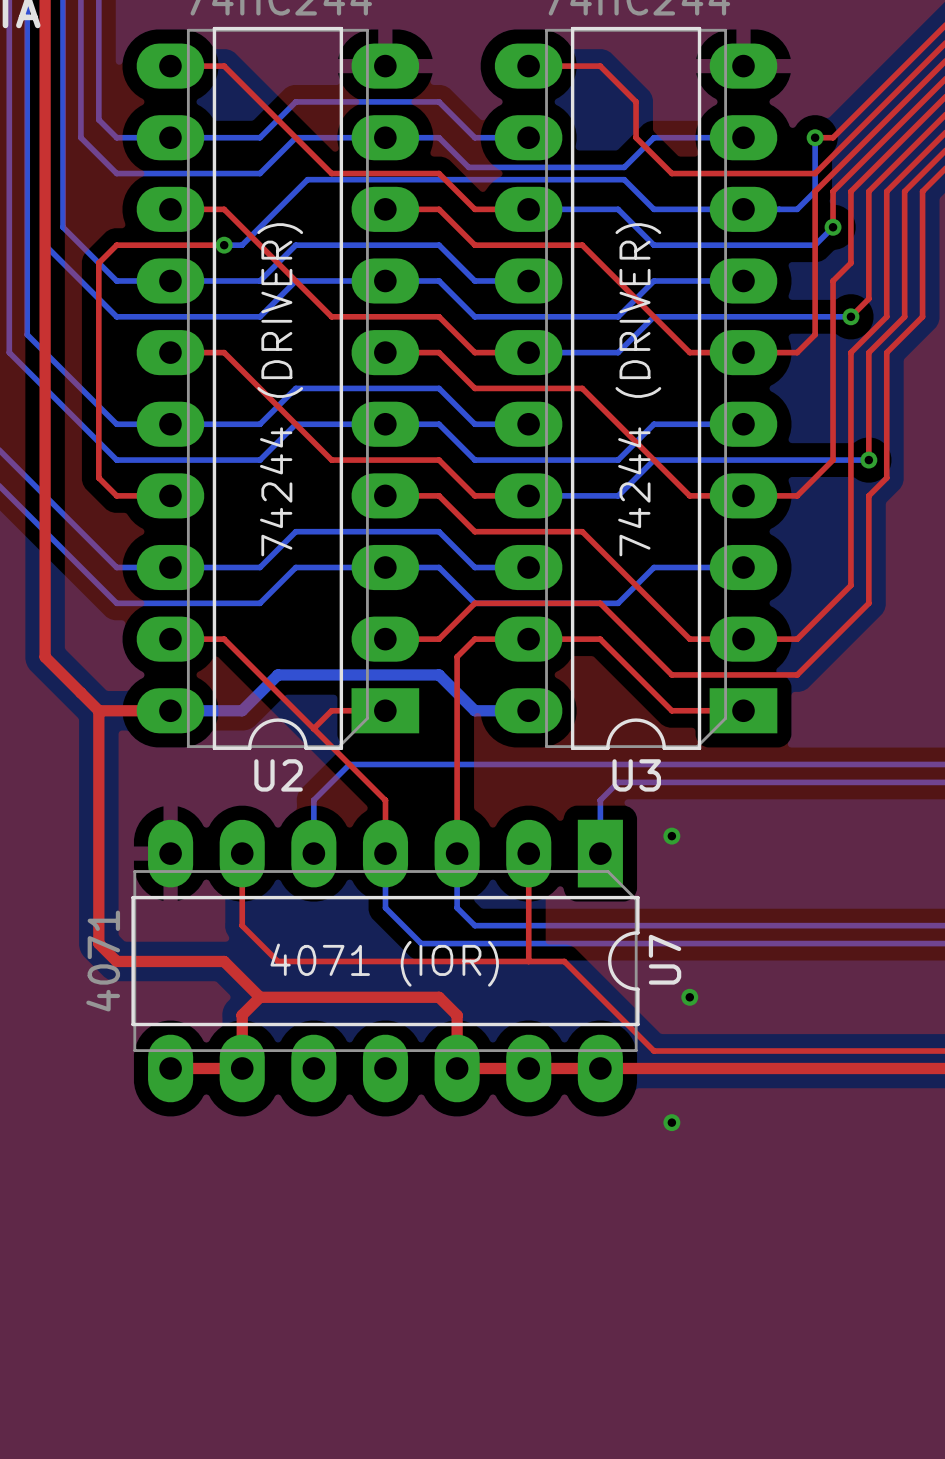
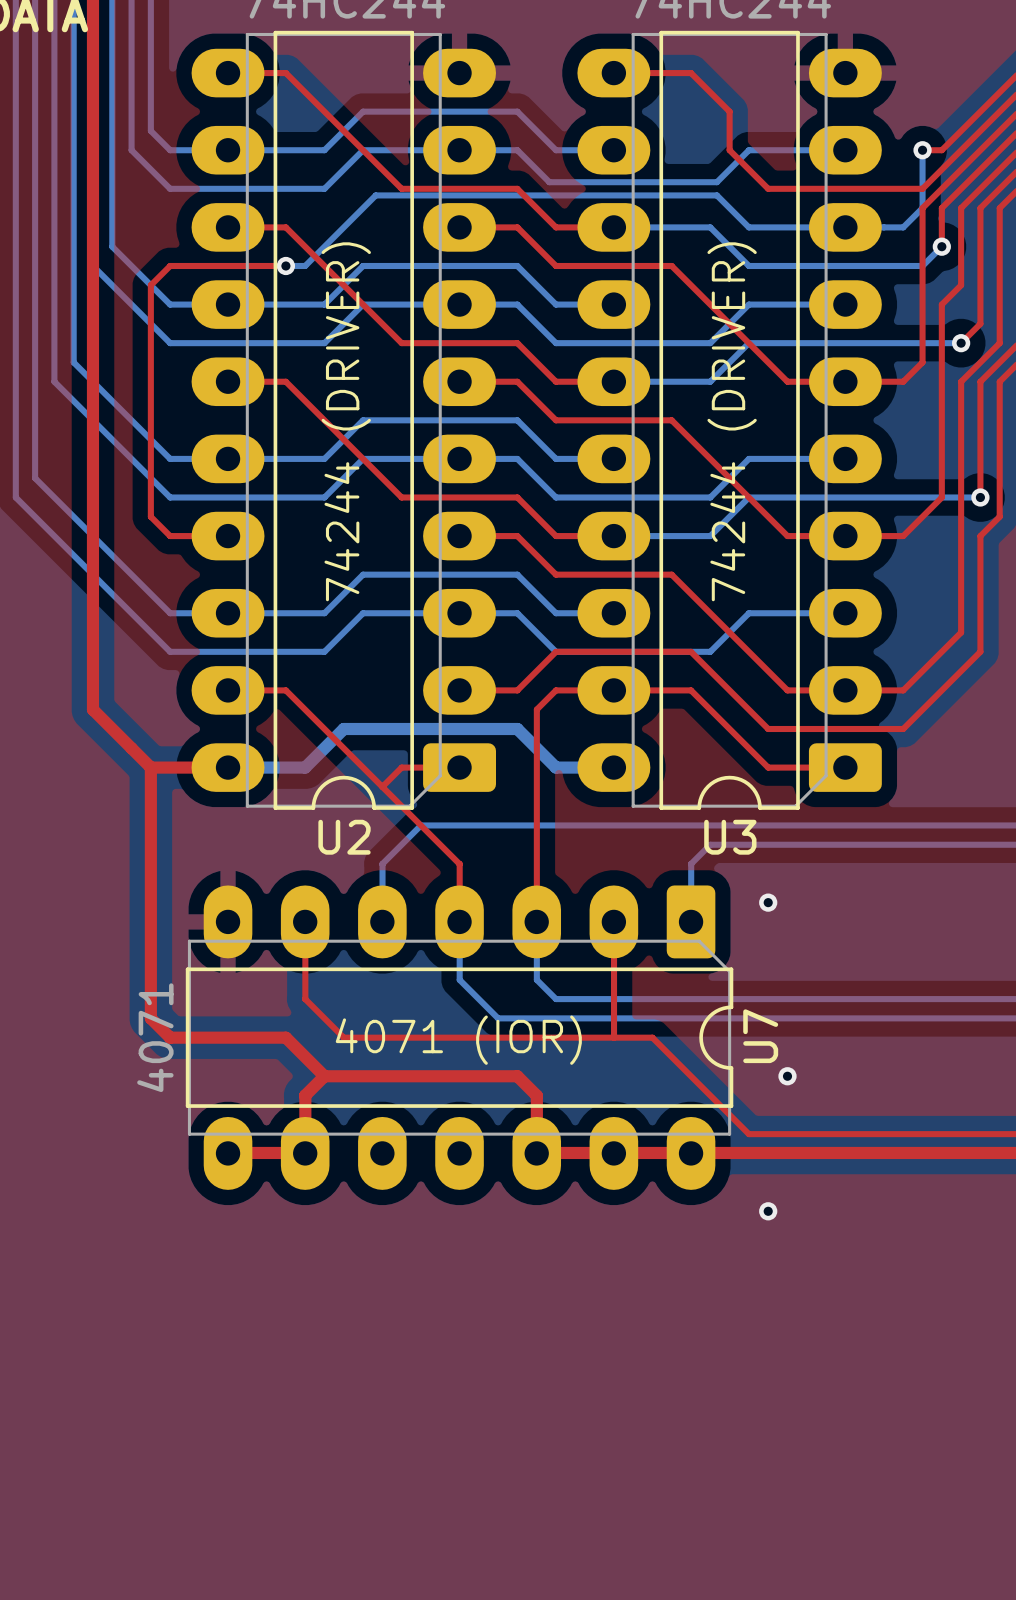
U2 footprint: [136, 26, 420, 750] -> [191, 30, 496, 810]
U3 footprint: [494, 26, 778, 750] -> [577, 30, 882, 810]
U7 footprint: [131, 819, 640, 1103] -> [185, 885, 734, 1190]

